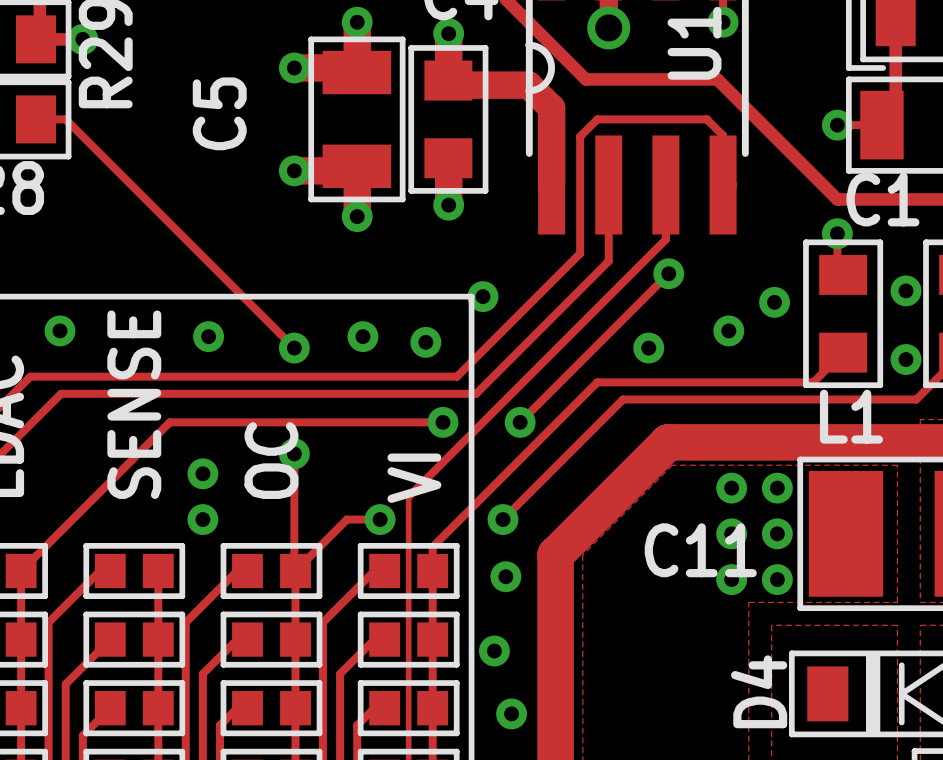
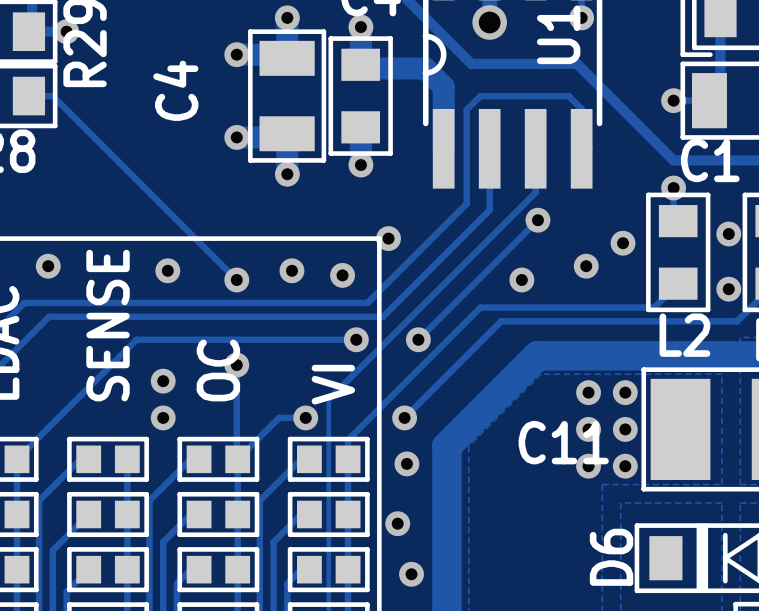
C5 name: C5 (219, 113) -> C4 (175, 90)
L1 name: L1 (851, 416) -> L2 (684, 335)
D4 name: D4 (759, 691) -> D6 (611, 557)

